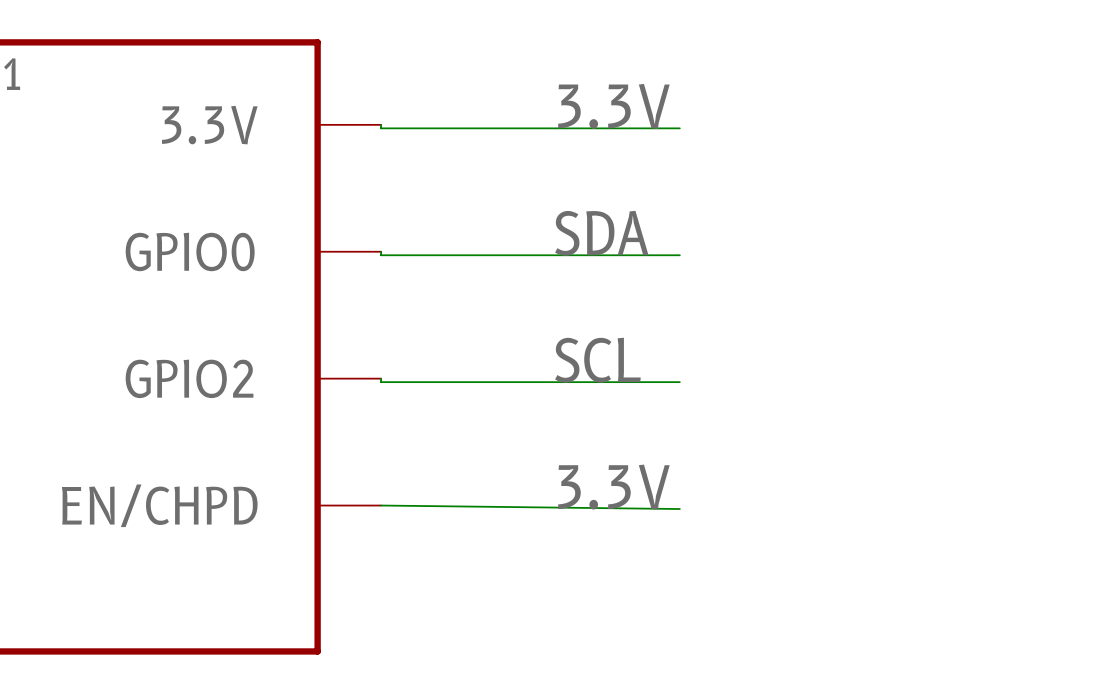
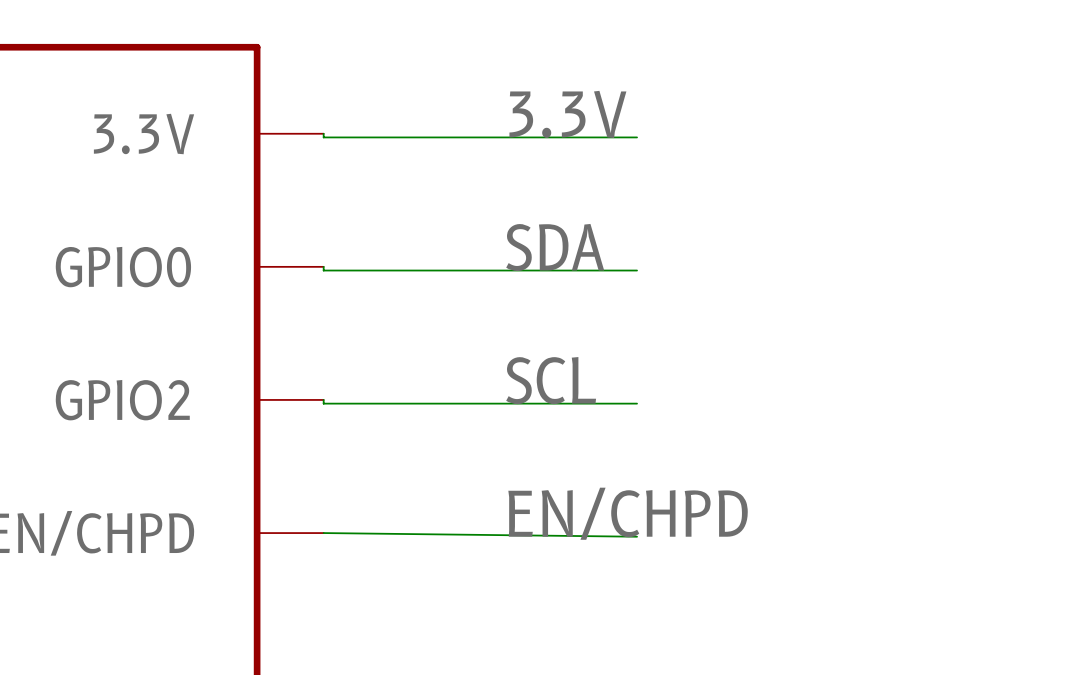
label: 3.3V (613, 487) -> EN/CHPD (628, 513)

